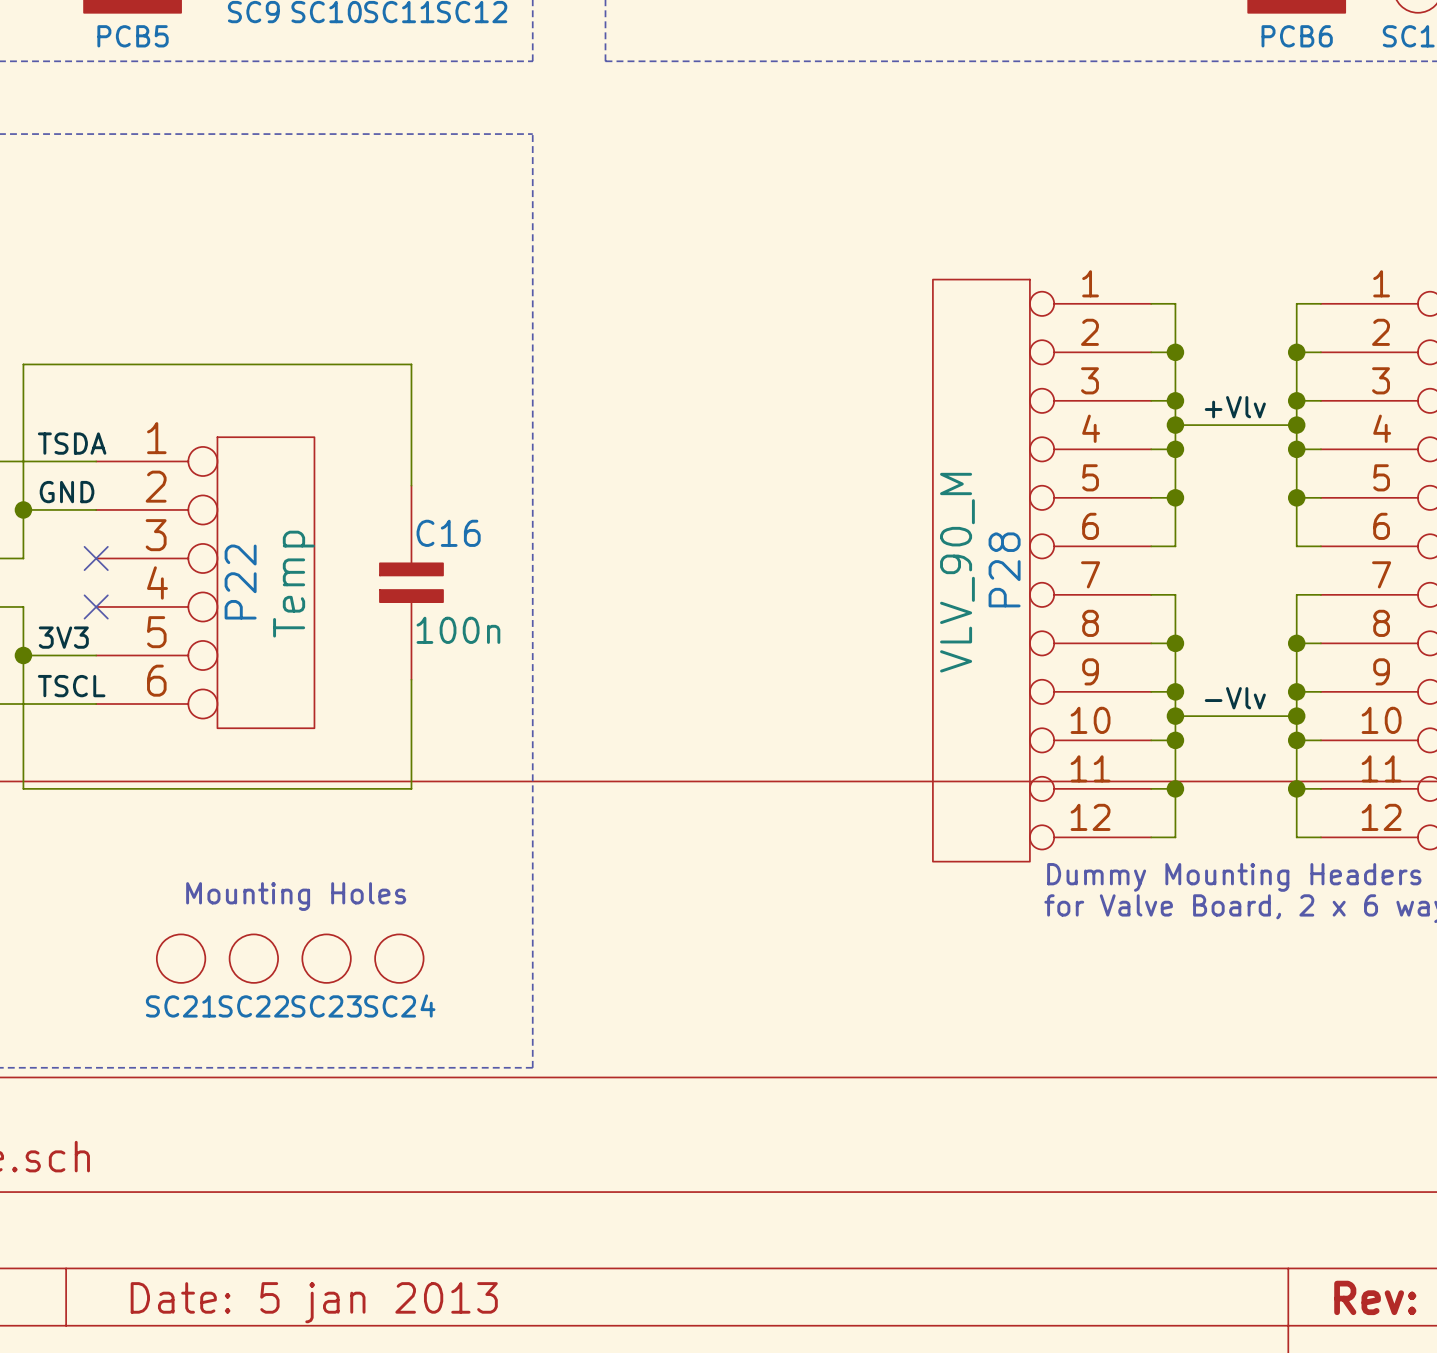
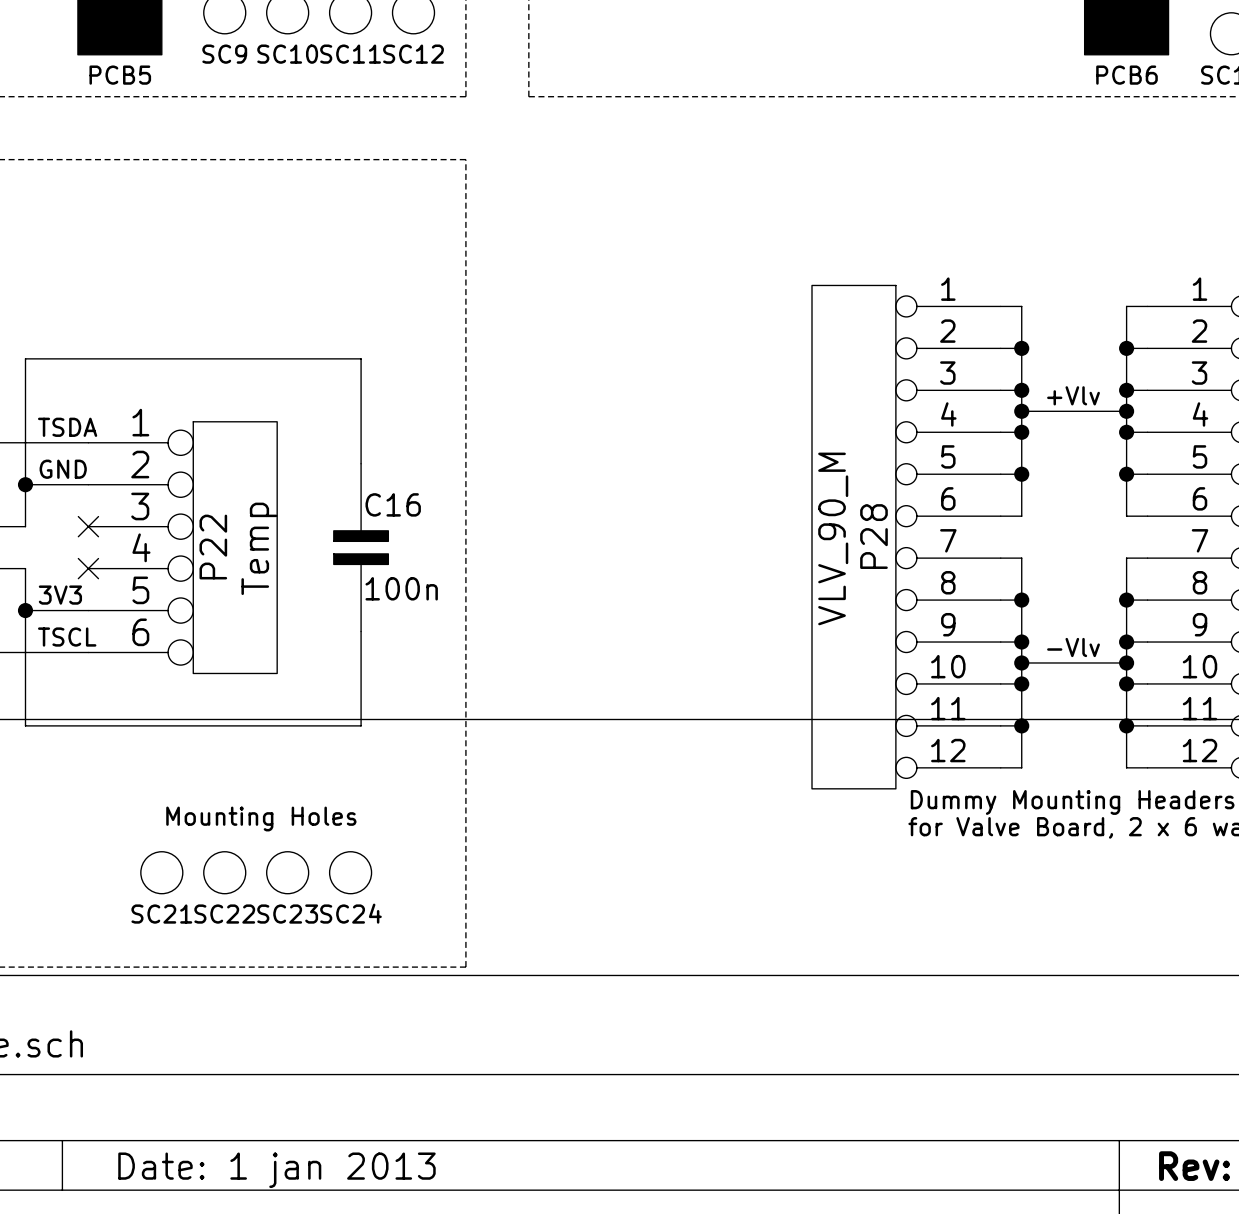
title block: Date: 5 jan 2013 (314, 1302) -> Date: 1 jan 2013 (276, 1170)

